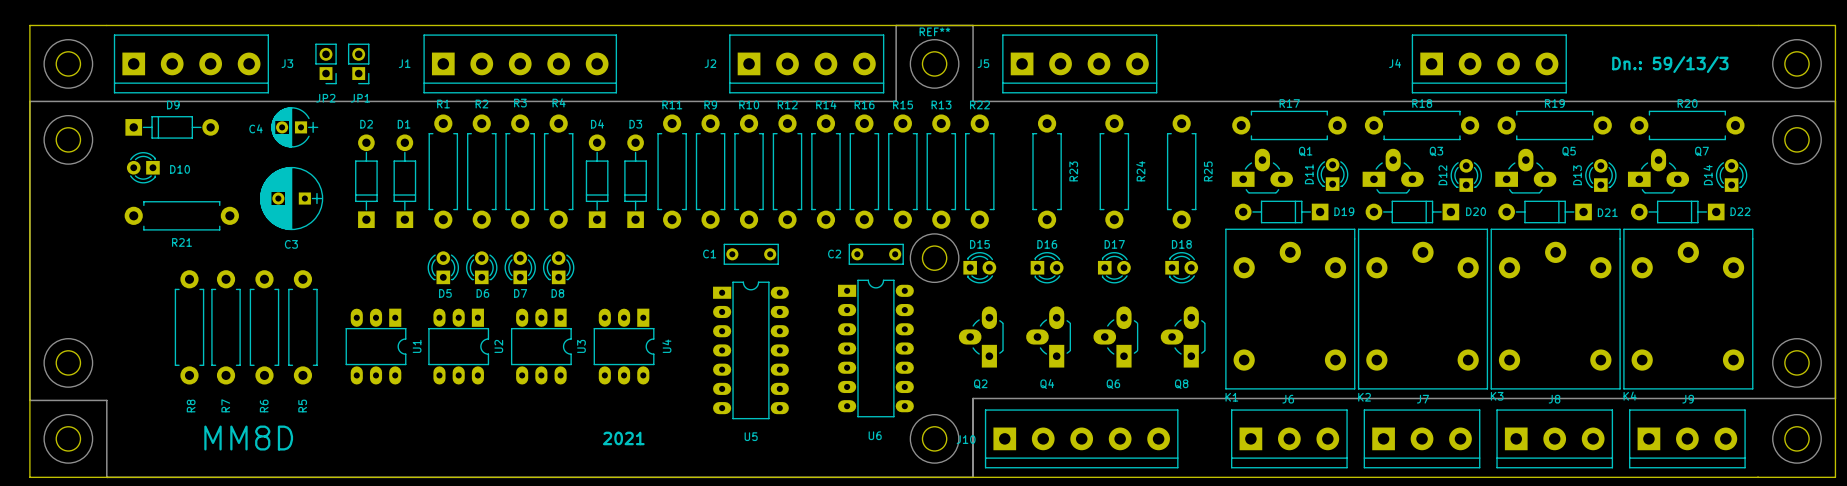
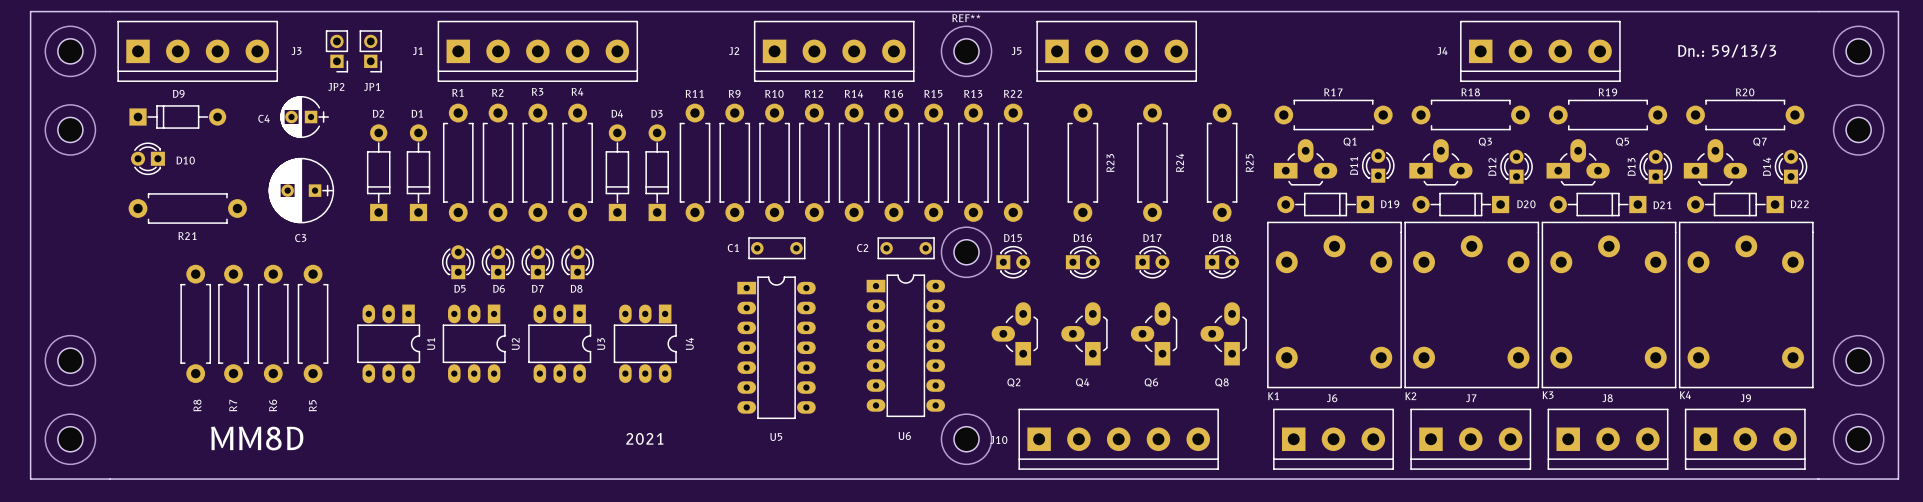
line: (896, 25) (896, 101) (29, 101) (29, 400) (106, 400) (106, 477) (973, 477) (973, 398) (1835, 398) (1835, 101) (973, 101) (973, 25) (896, 25) -> none

